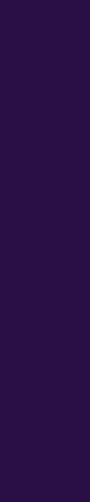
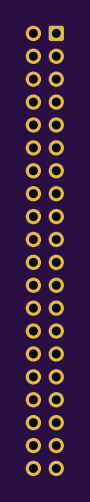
part: none -> (44, 250)

